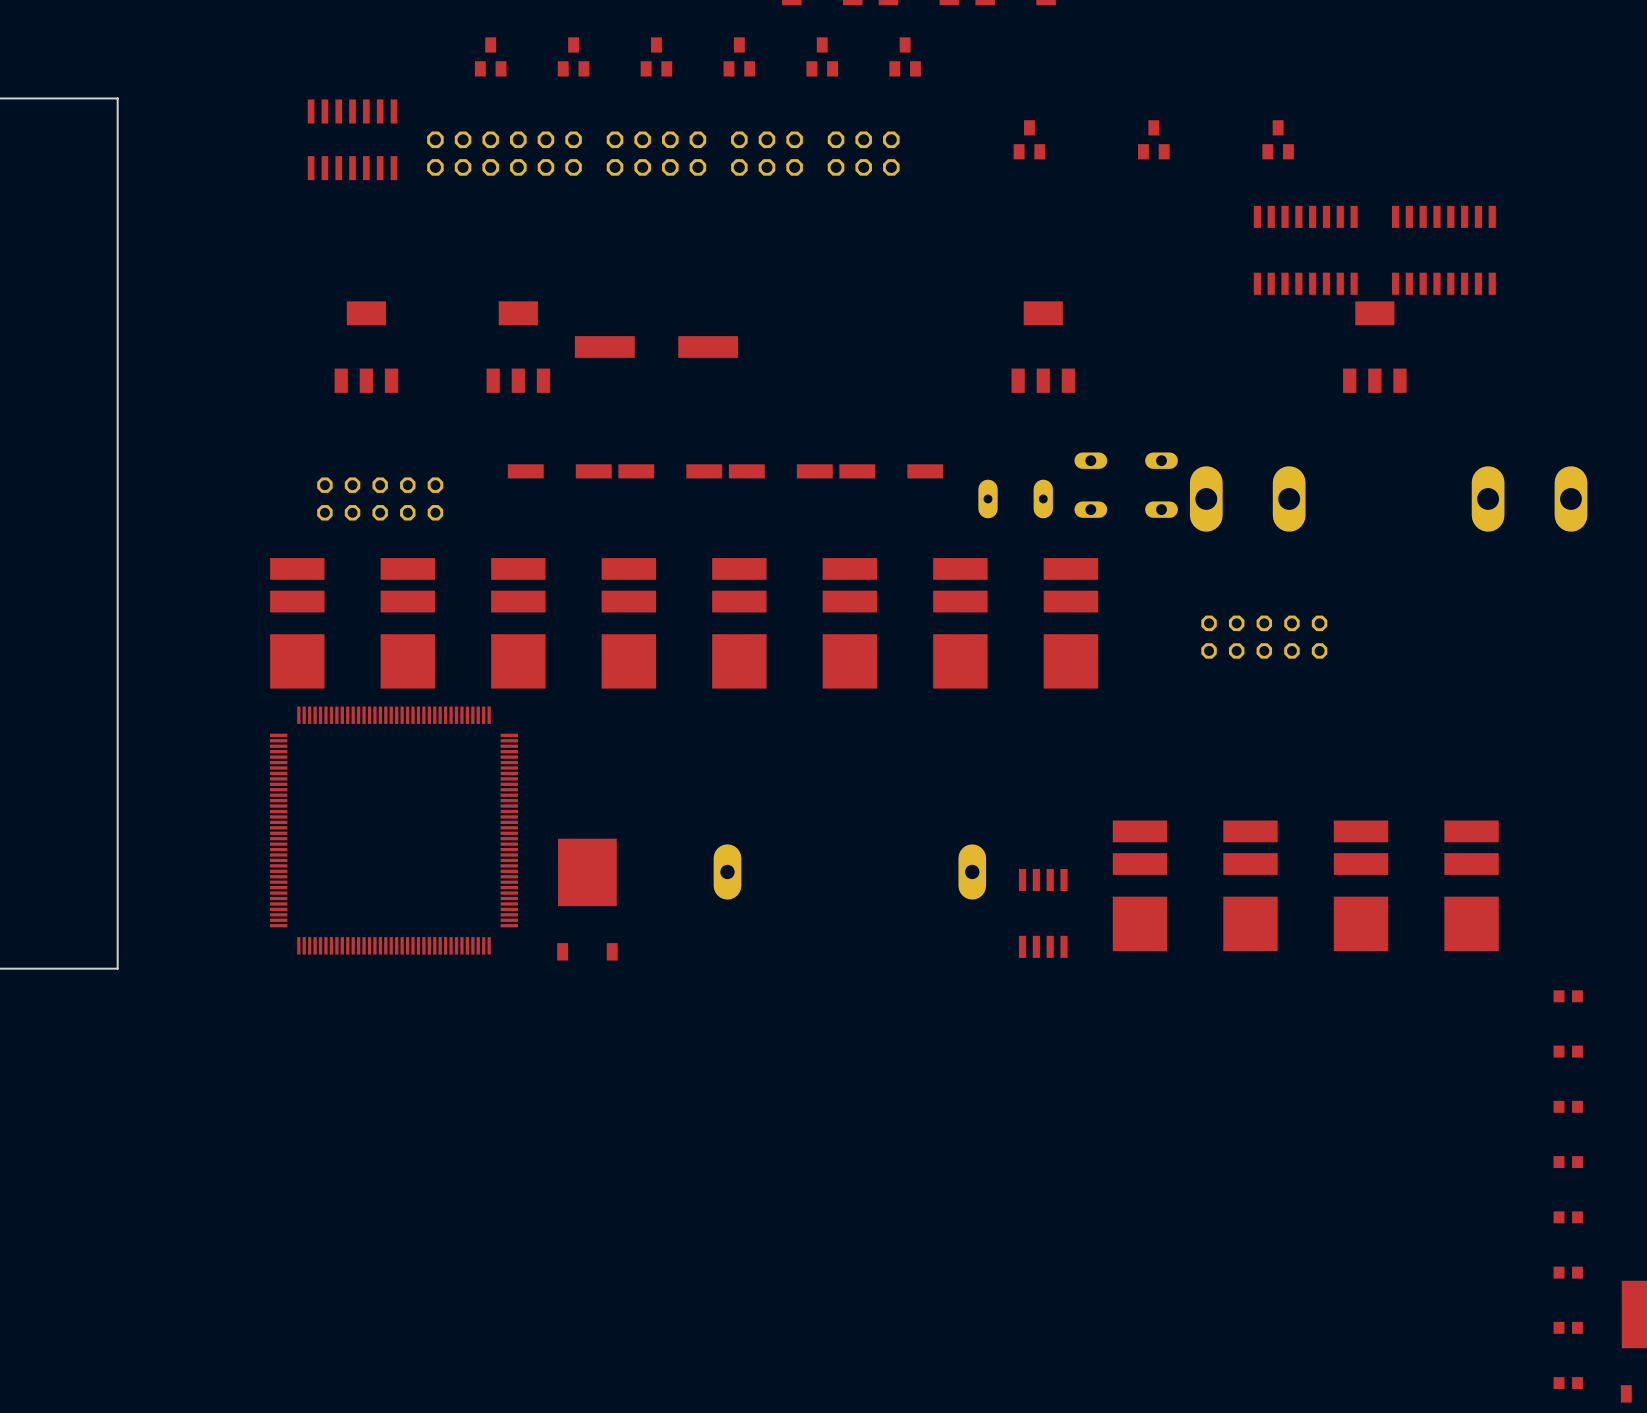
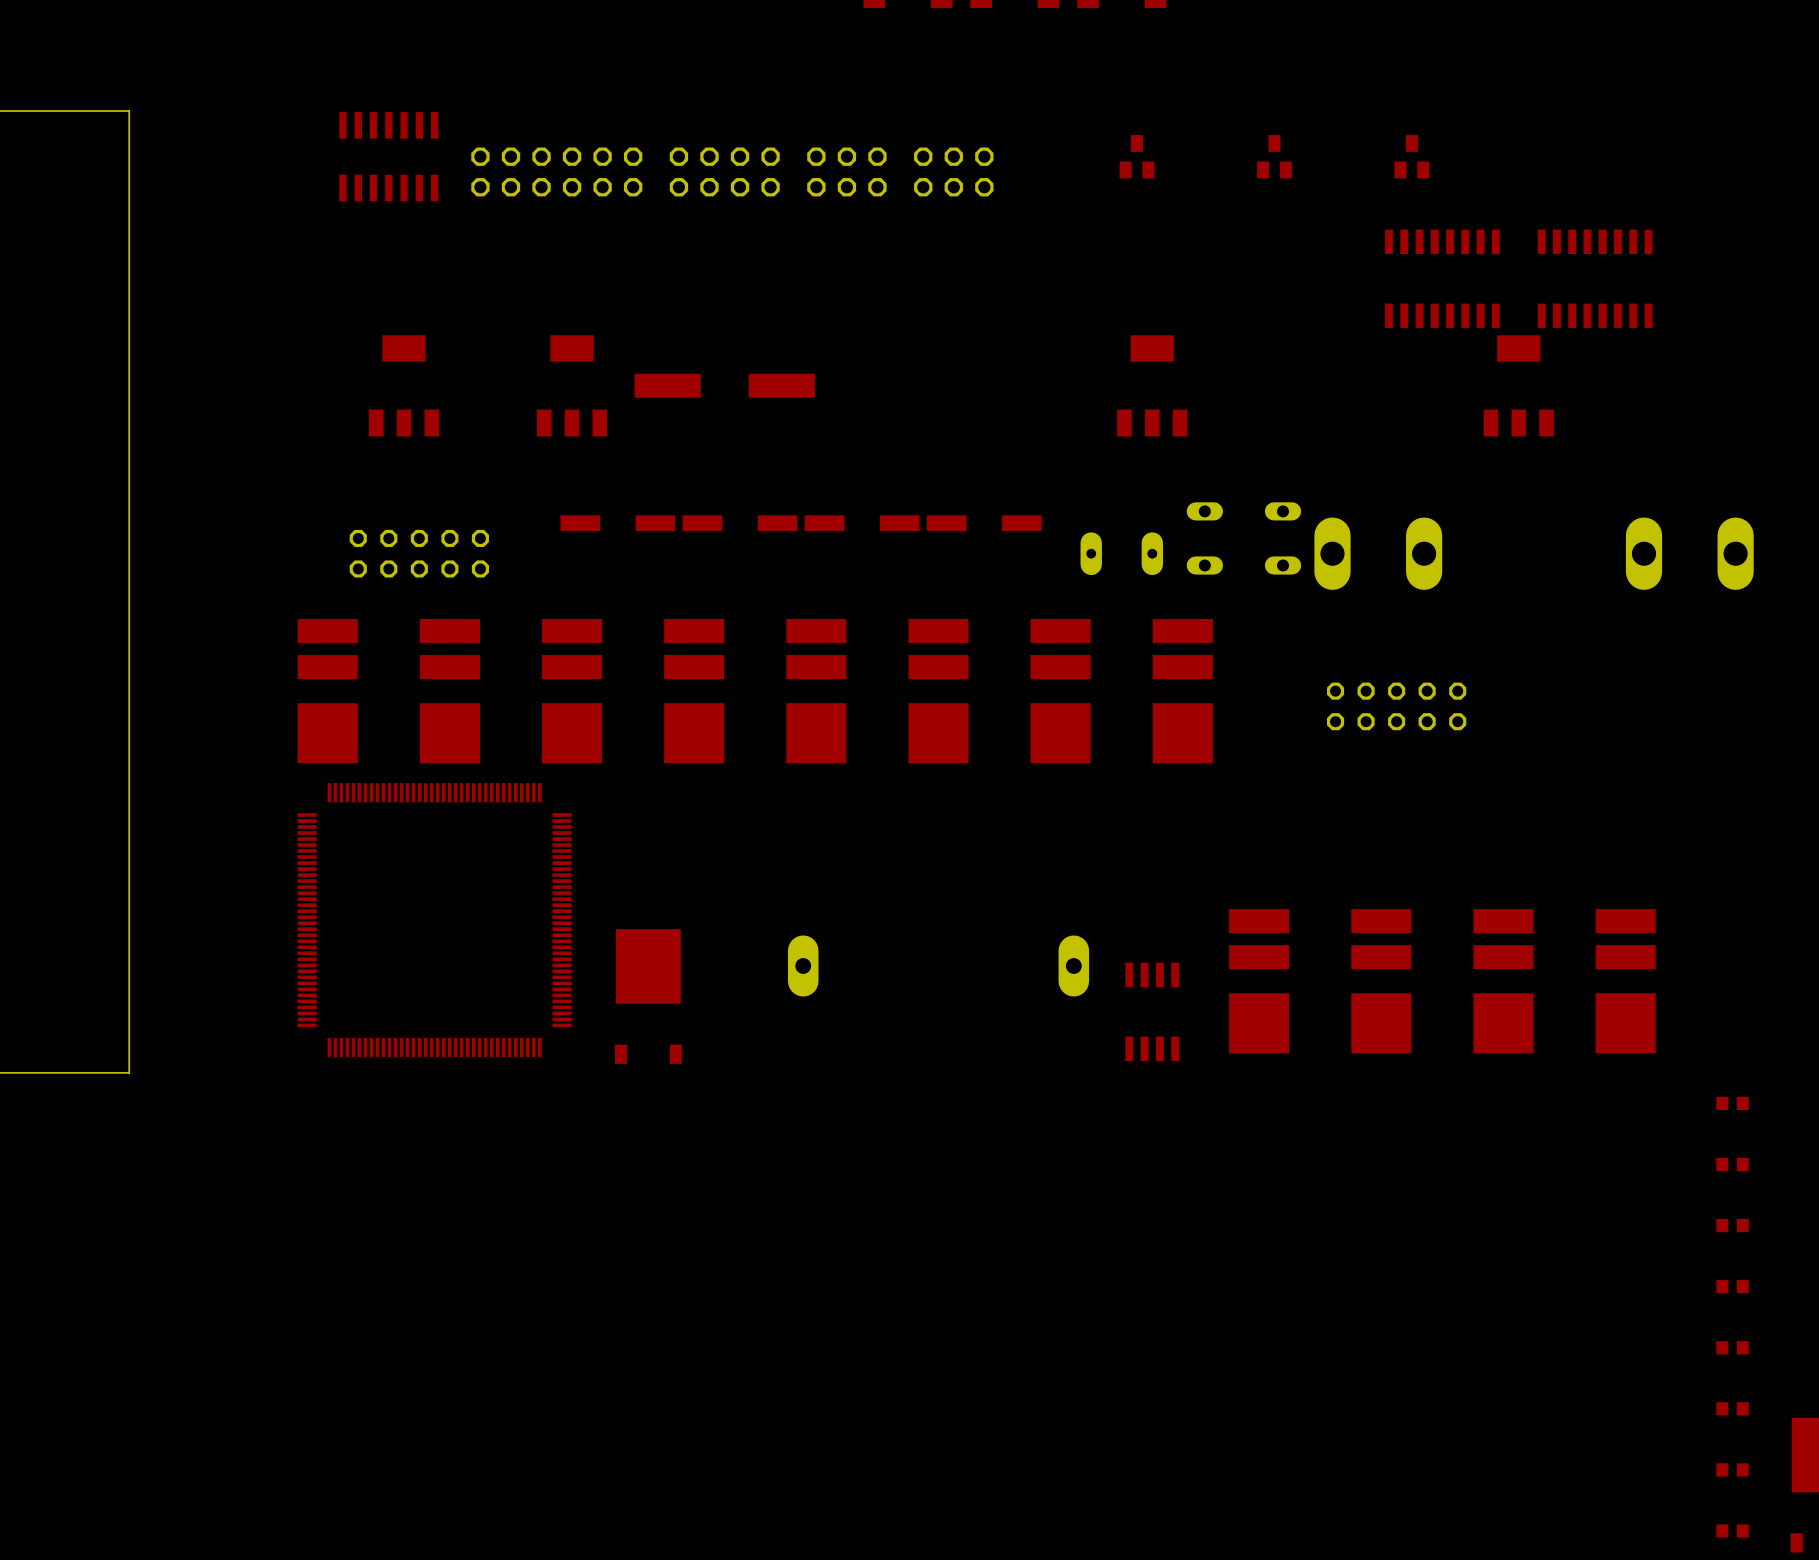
part: (490, 56) -> none
part: (573, 56) -> none
part: (656, 56) -> none
part: (739, 56) -> none
part: (822, 56) -> none
part: (905, 56) -> none

